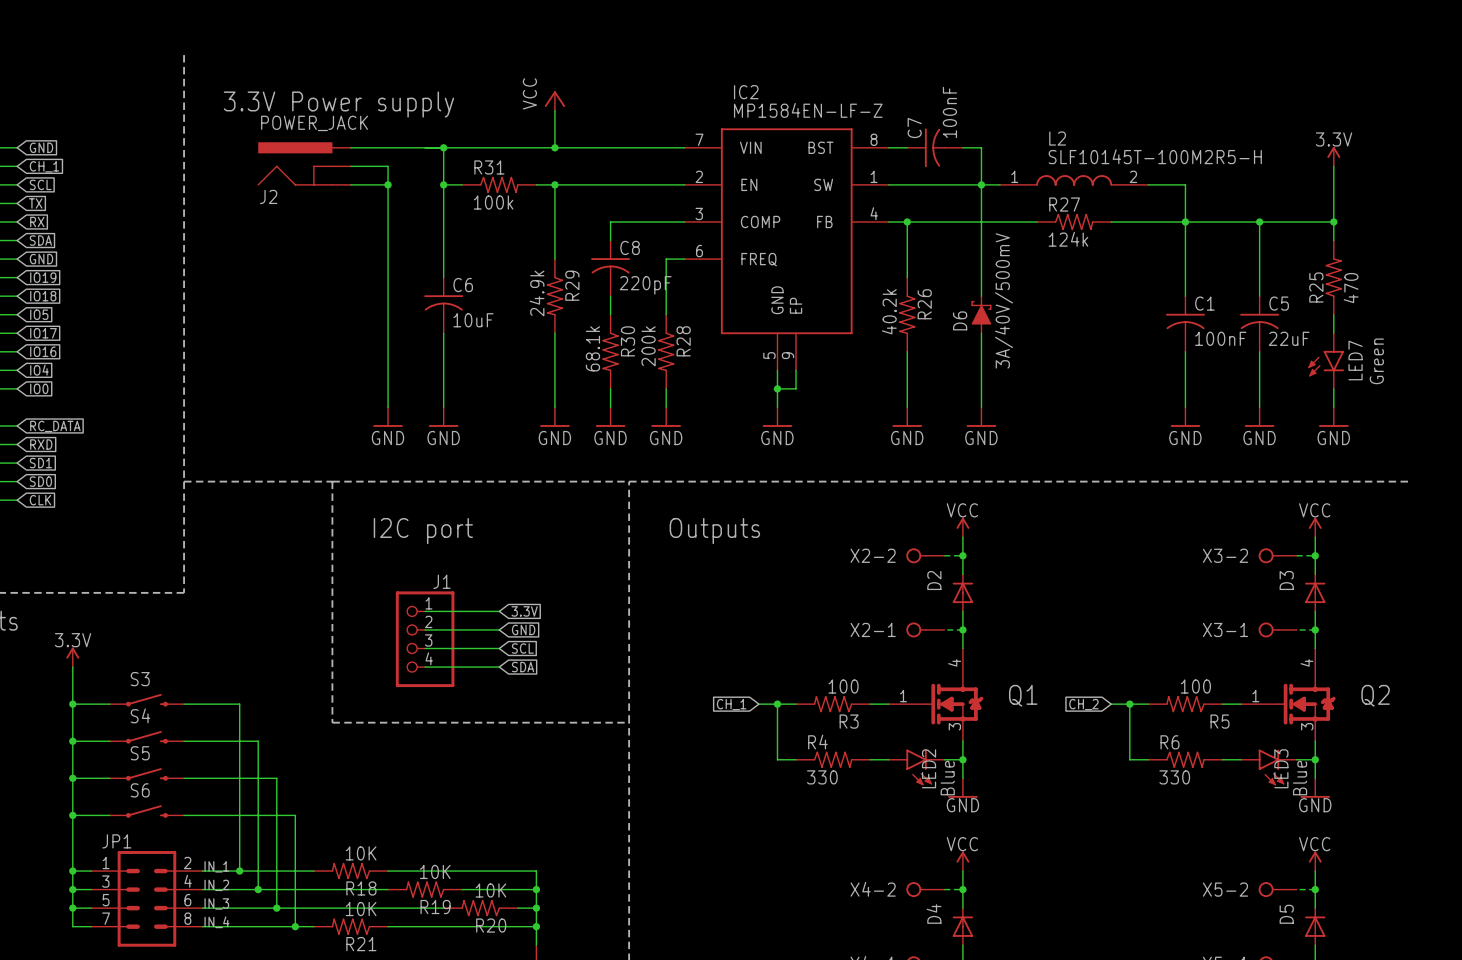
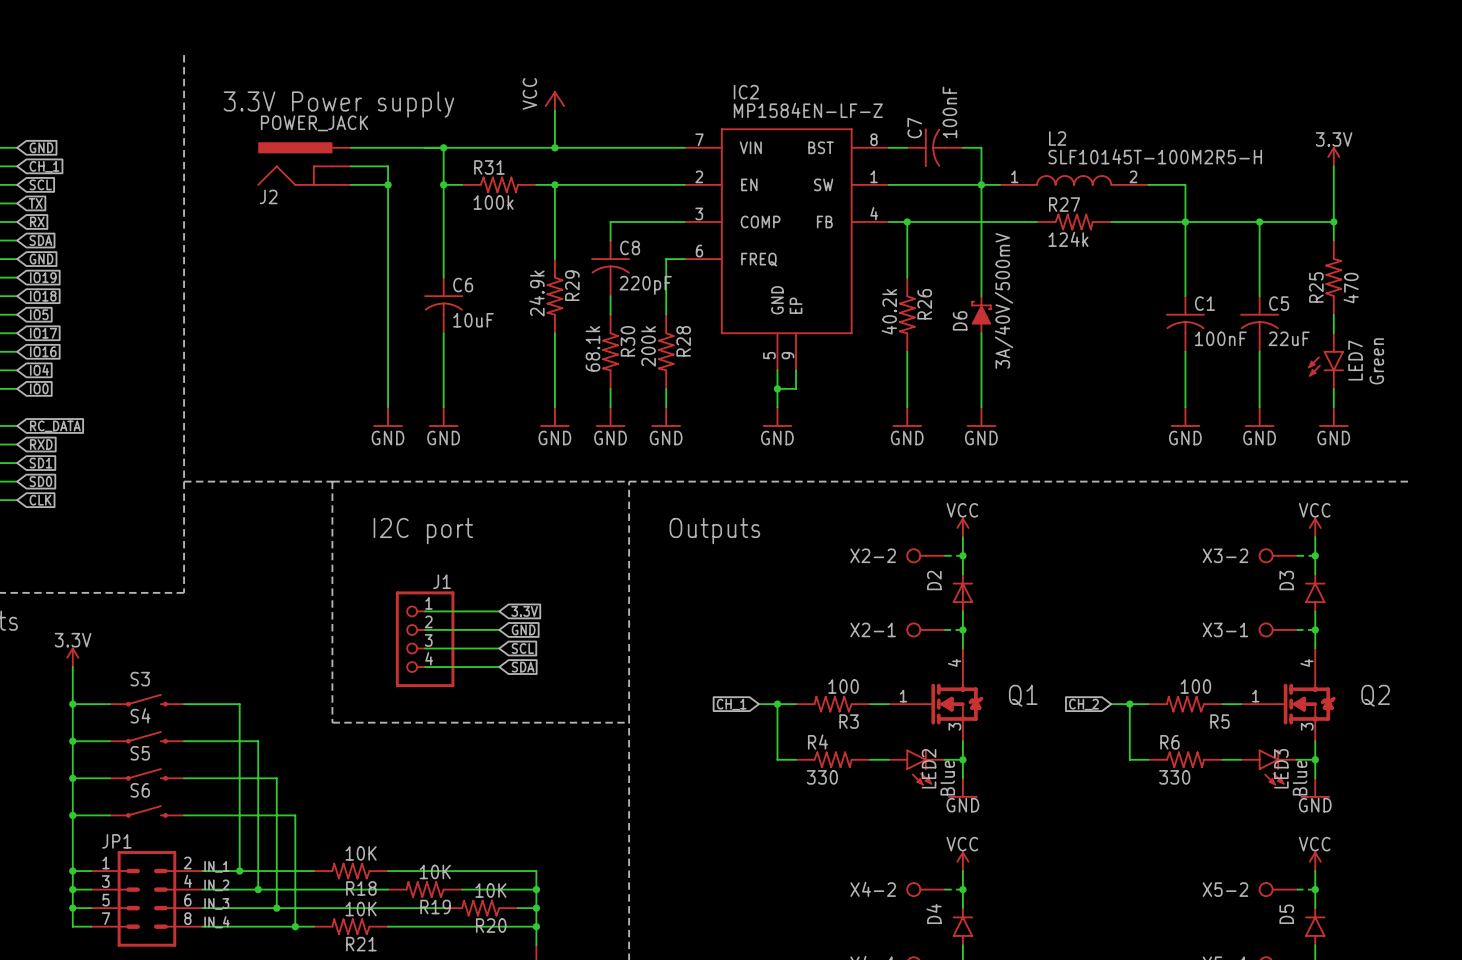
D3 symbol: [1305, 574, 1326, 612] -> [1305, 573, 1326, 613]
D4 symbol: [952, 908, 974, 946] -> [952, 907, 974, 947]
D5 symbol: [1305, 908, 1326, 946] -> [1305, 907, 1326, 947]

